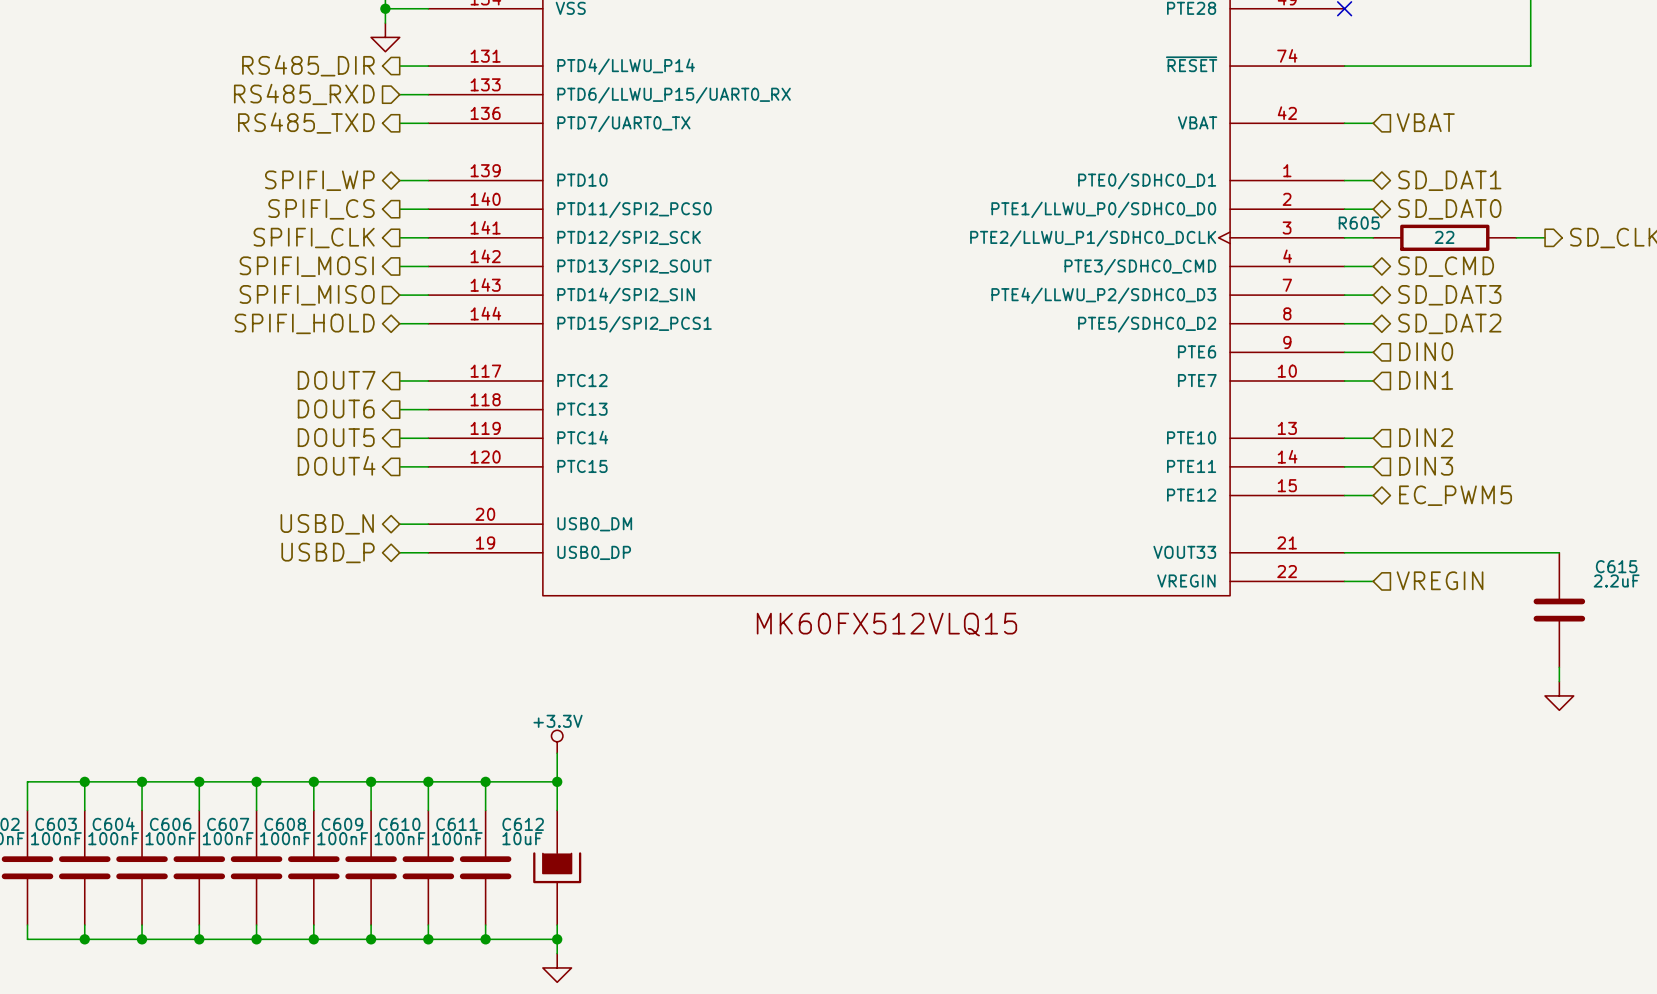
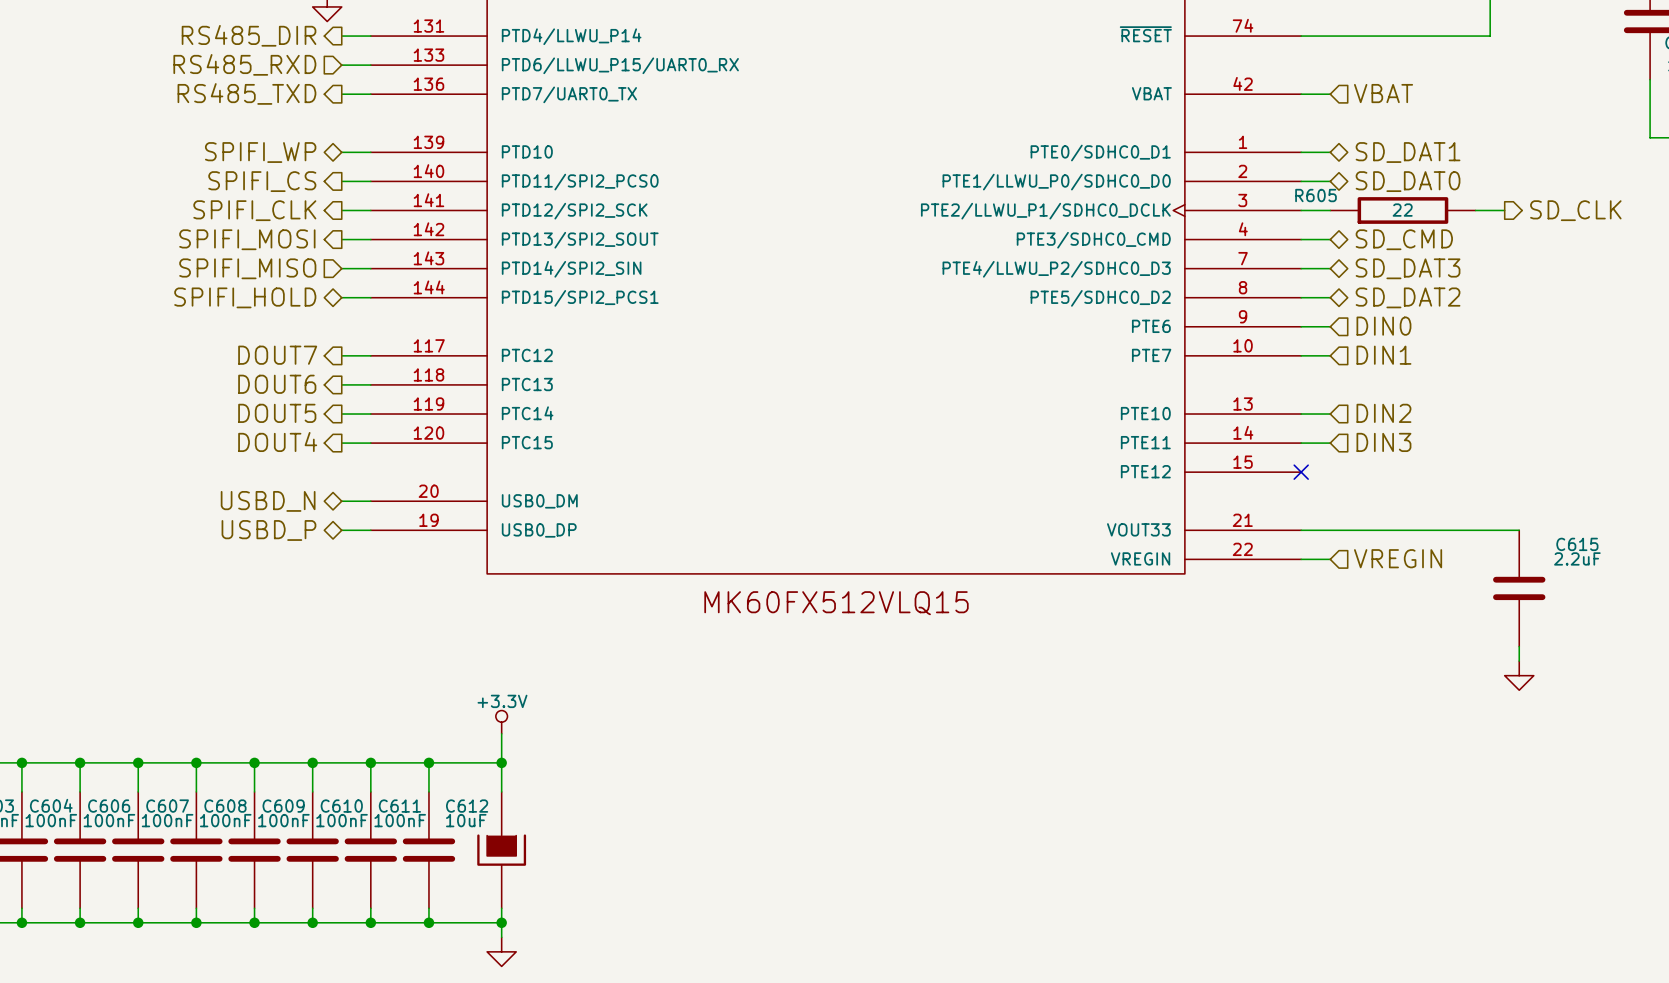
wire: (1344, 495) (1373, 495) -> none
no-connect mark: none -> (1301, 472)
hierarchical label: EC_PWM5 (1455, 495) -> none

